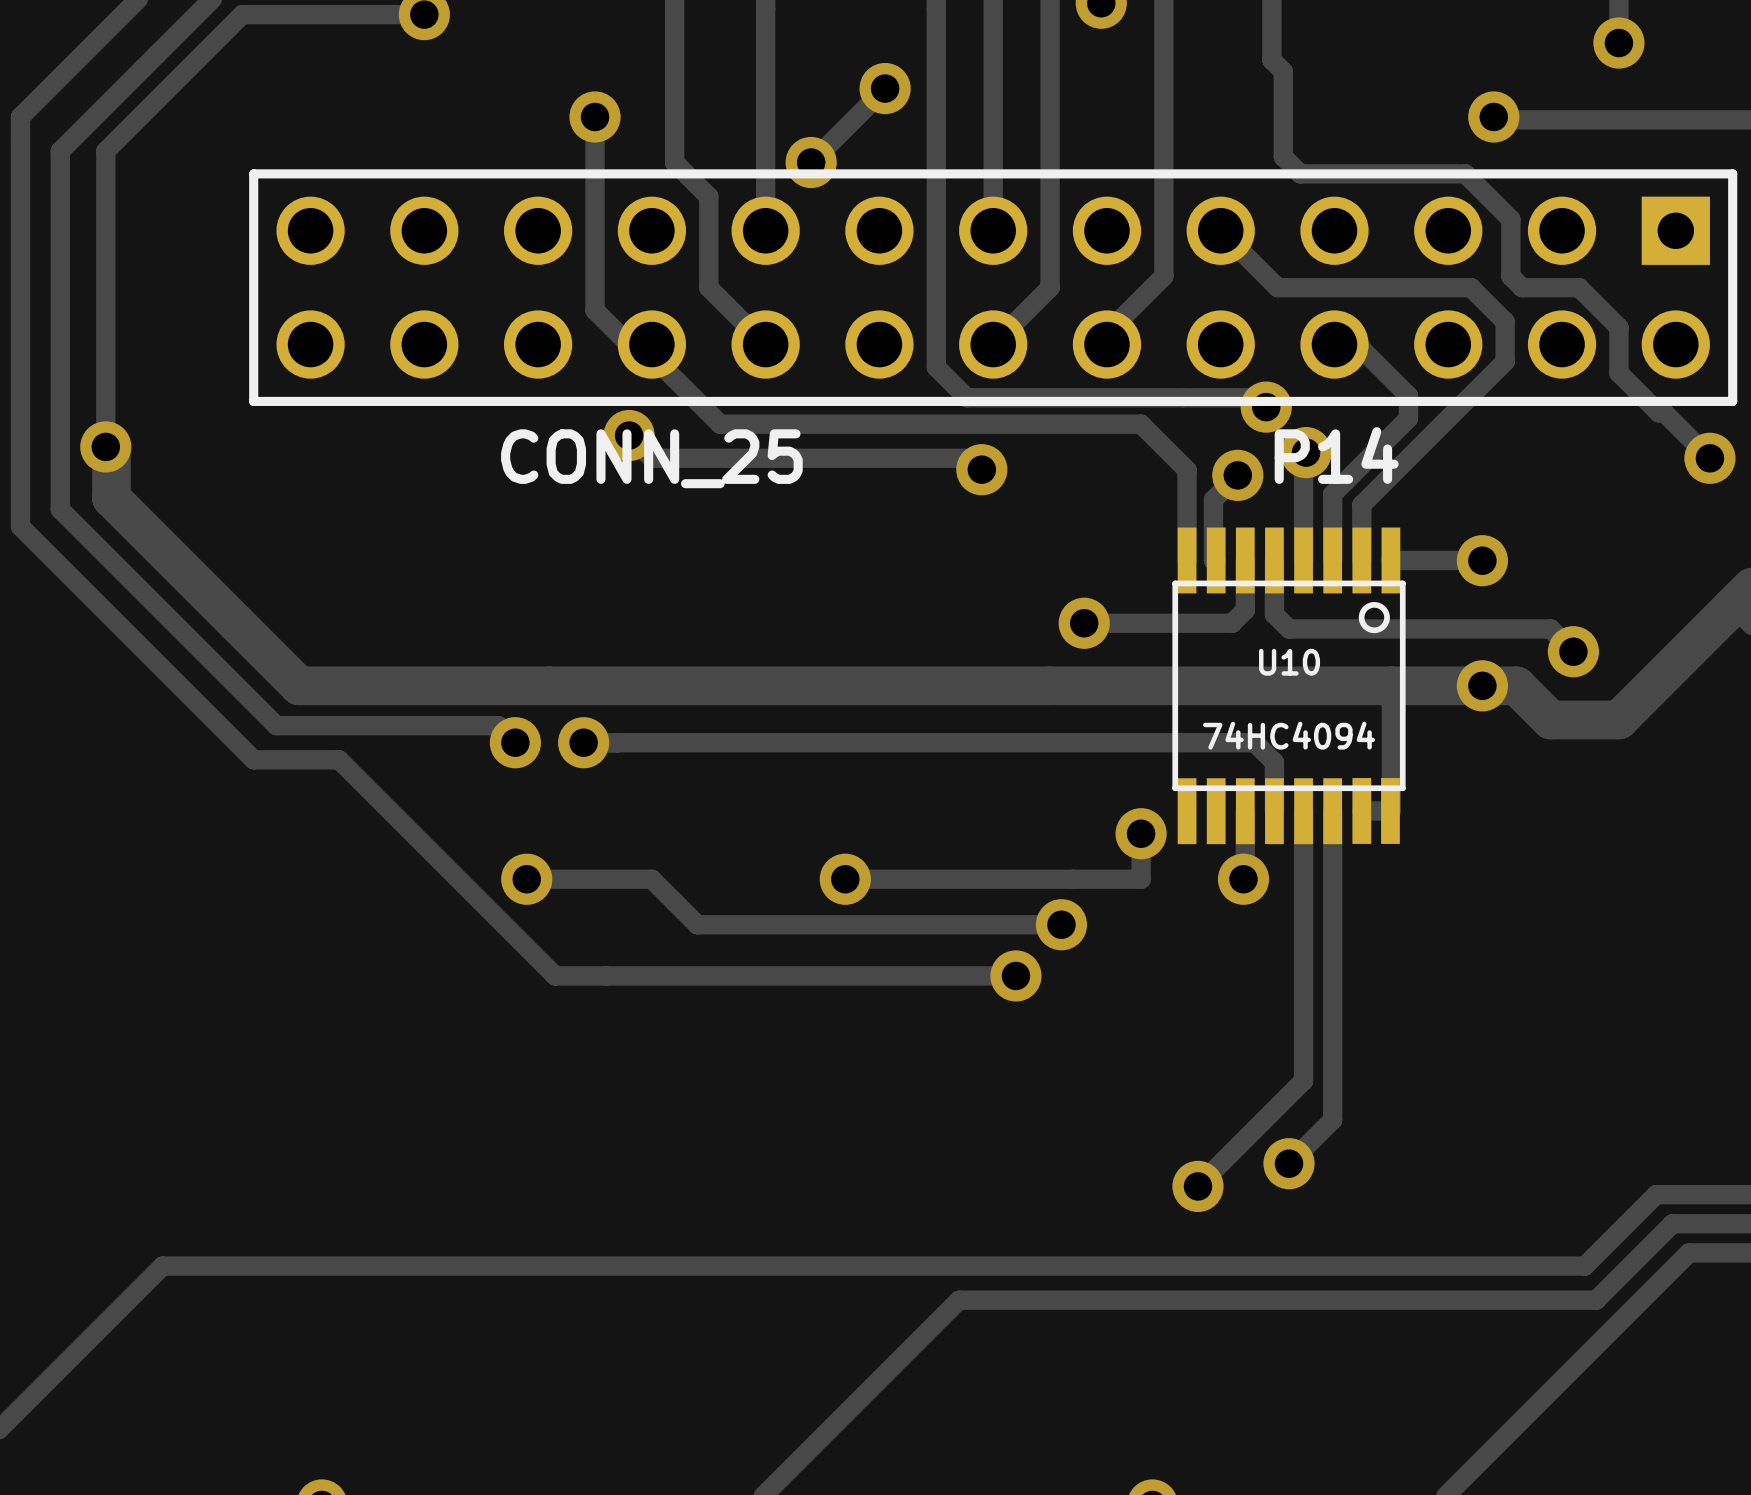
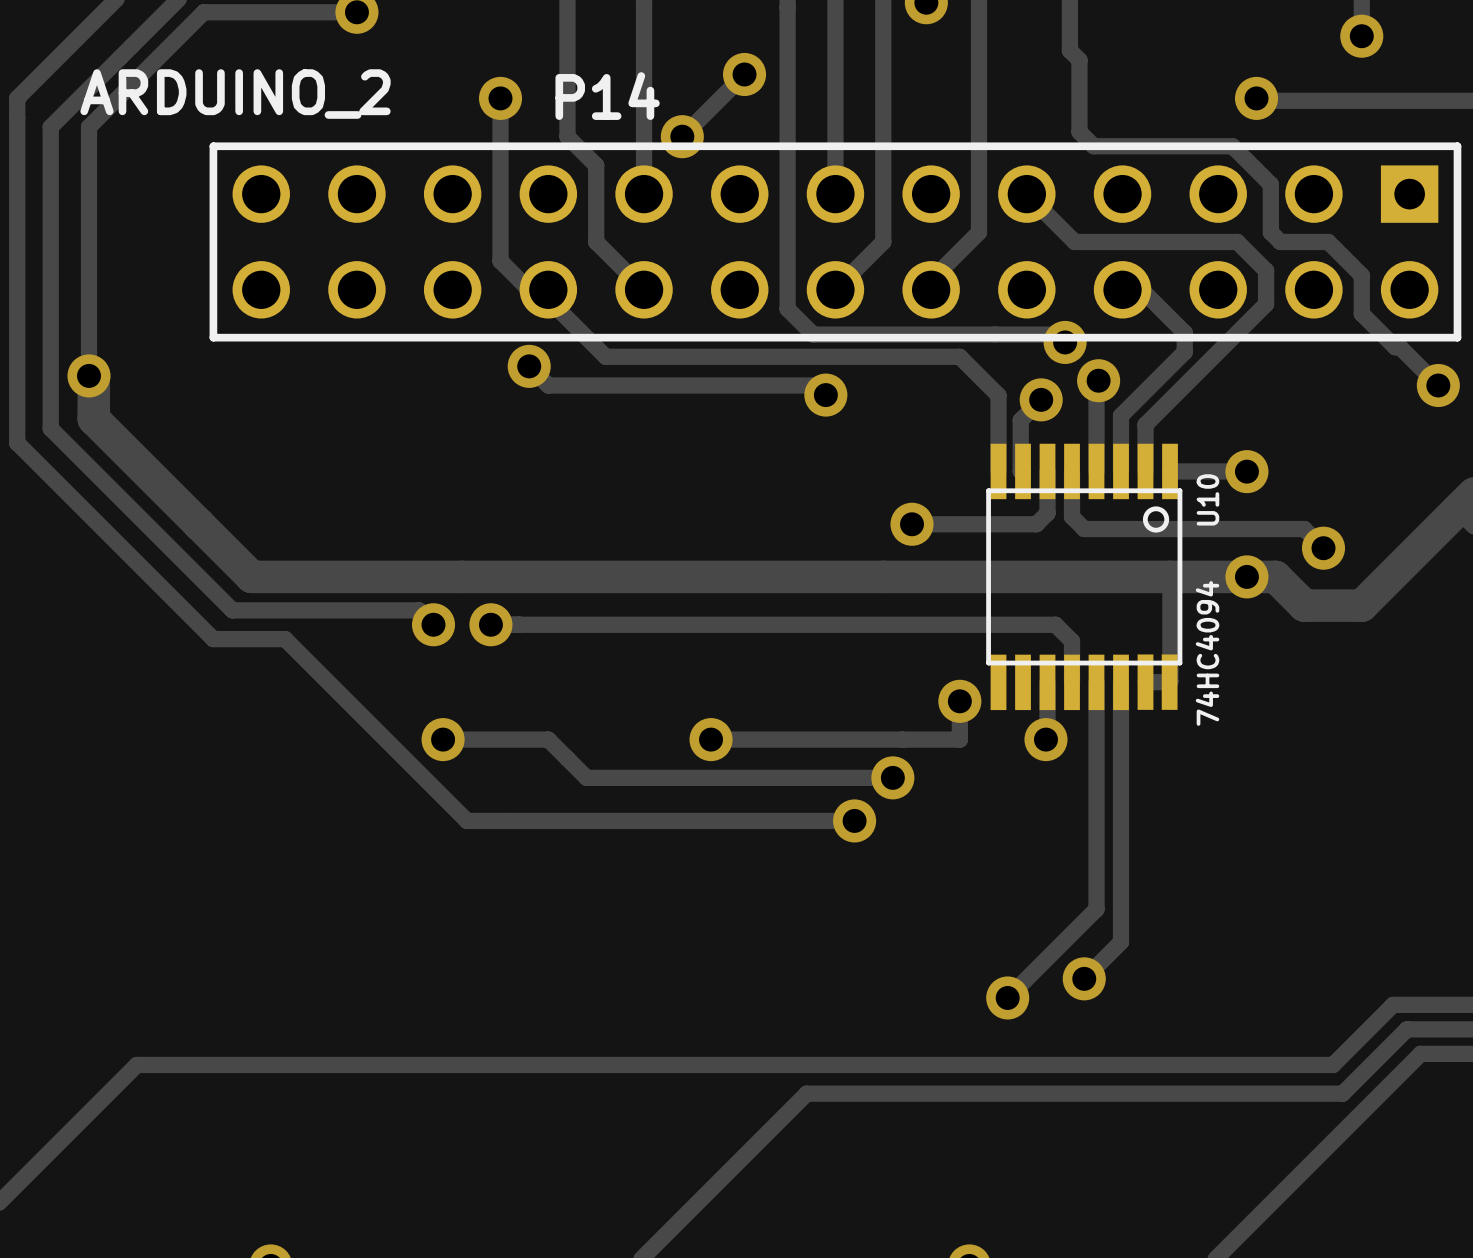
P14 name position: P14 (1336, 455) -> P14 (607, 96)
P14 value: CONN_25 (651, 458) -> ARDUINO_2 (235, 94)
U10 name rotation: 0° (1289, 662) -> 90° counterclockwise (1207, 499)
U10 name position: U10 (1289, 662) -> U10 (1207, 499)
U10 value rotation: 0° (1289, 735) -> 90° counterclockwise (1207, 653)

